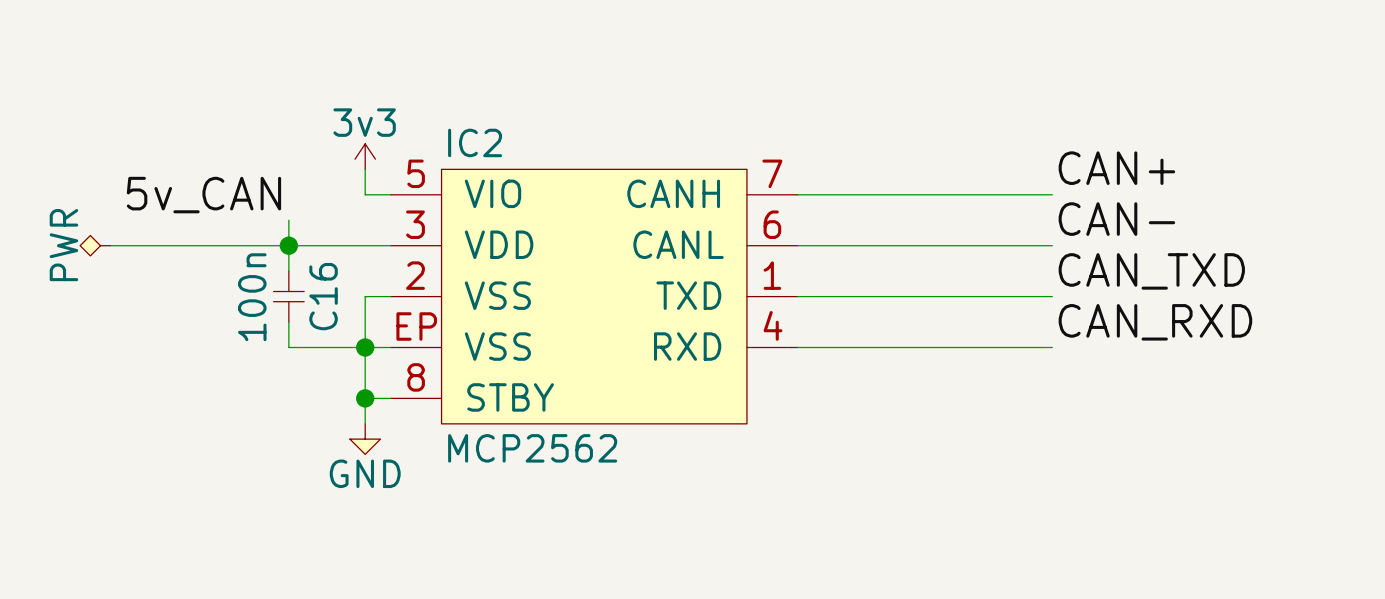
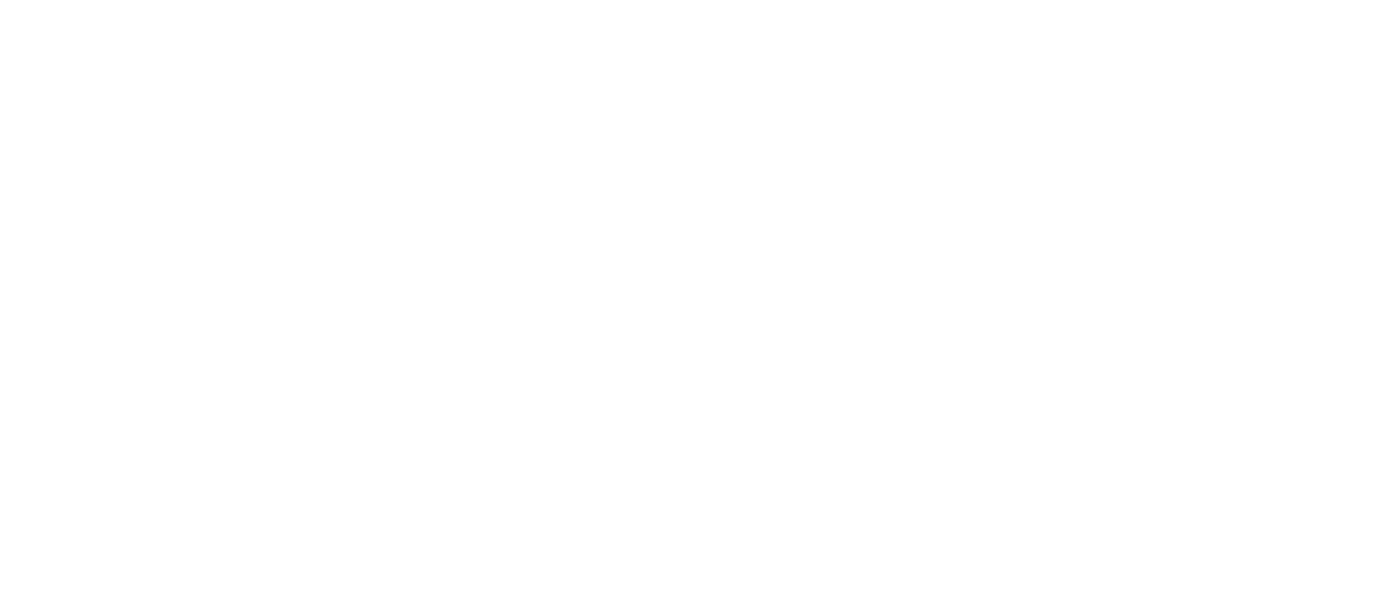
power symbol: 3v3 (365, 156) -> none
label: CAN+ (1116, 168) -> none
wire: (365, 169) (365, 194) (390, 194) -> none
wire: (797, 194) (1052, 194) -> none
label: 5v_CAN (203, 195) -> none
label: CAN- (1116, 219) -> none
wire: (288, 220) (288, 271) -> none
power symbol: PWR (95, 245) -> none
wire: (110, 245) (390, 245) -> none
junction: (288, 245) -> none
wire: (797, 245) (1052, 245) -> none
label: CAN_TXD (1151, 271) -> none
C16: 100n (288, 296) -> none
wire: (390, 296) (365, 296) (365, 423) -> none
IC2: MCP2562 (594, 296) -> none
wire: (797, 296) (1052, 296) -> none
wire: (288, 322) (288, 347) (390, 347) -> none
label: CAN_RXD (1155, 322) -> none
junction: (365, 347) -> none
wire: (797, 347) (1052, 347) -> none
wire: (365, 398) (390, 398) -> none
junction: (365, 398) -> none
power symbol: GND (365, 439) -> none

